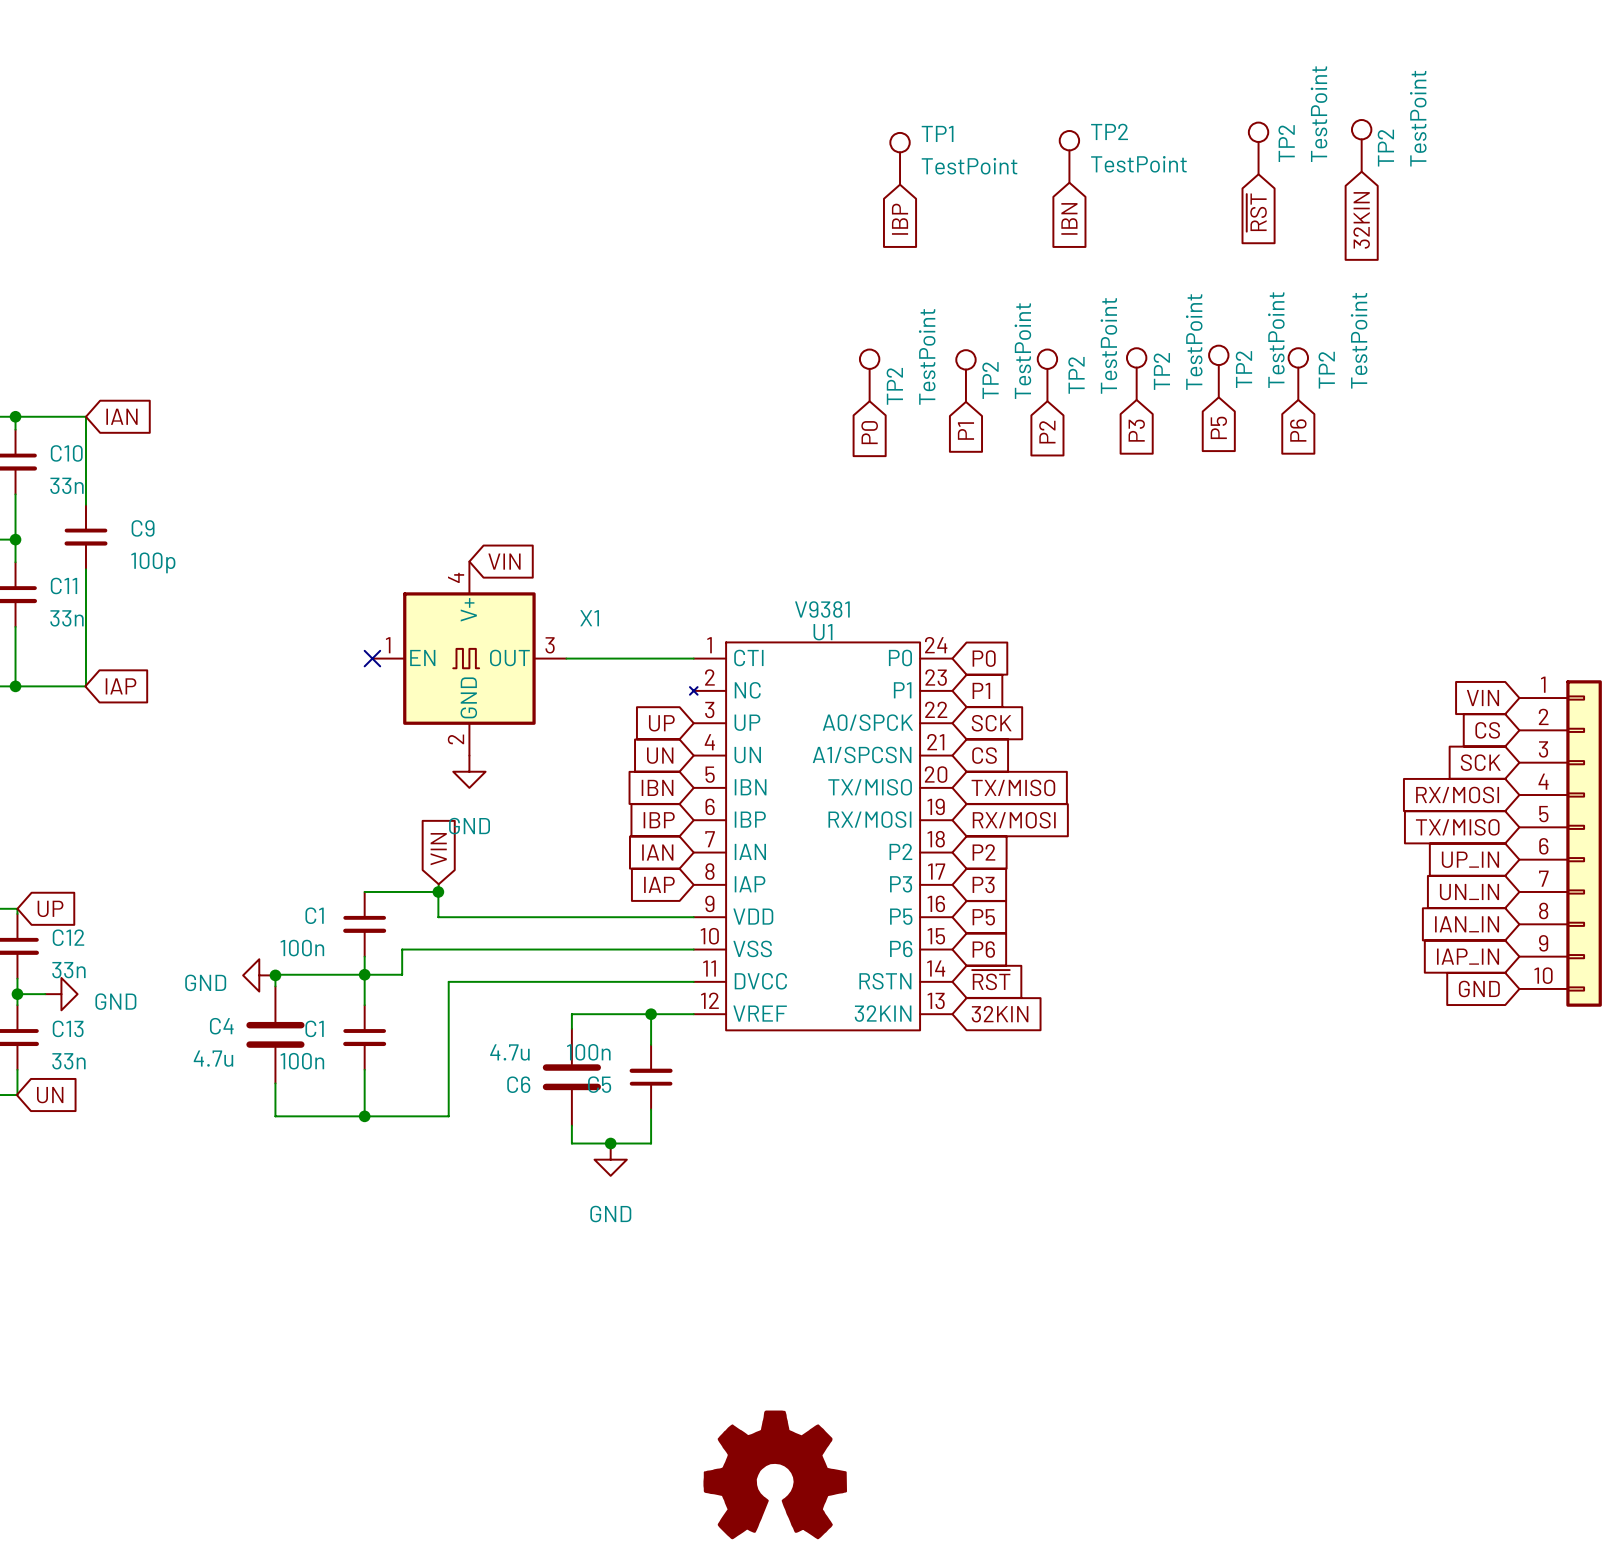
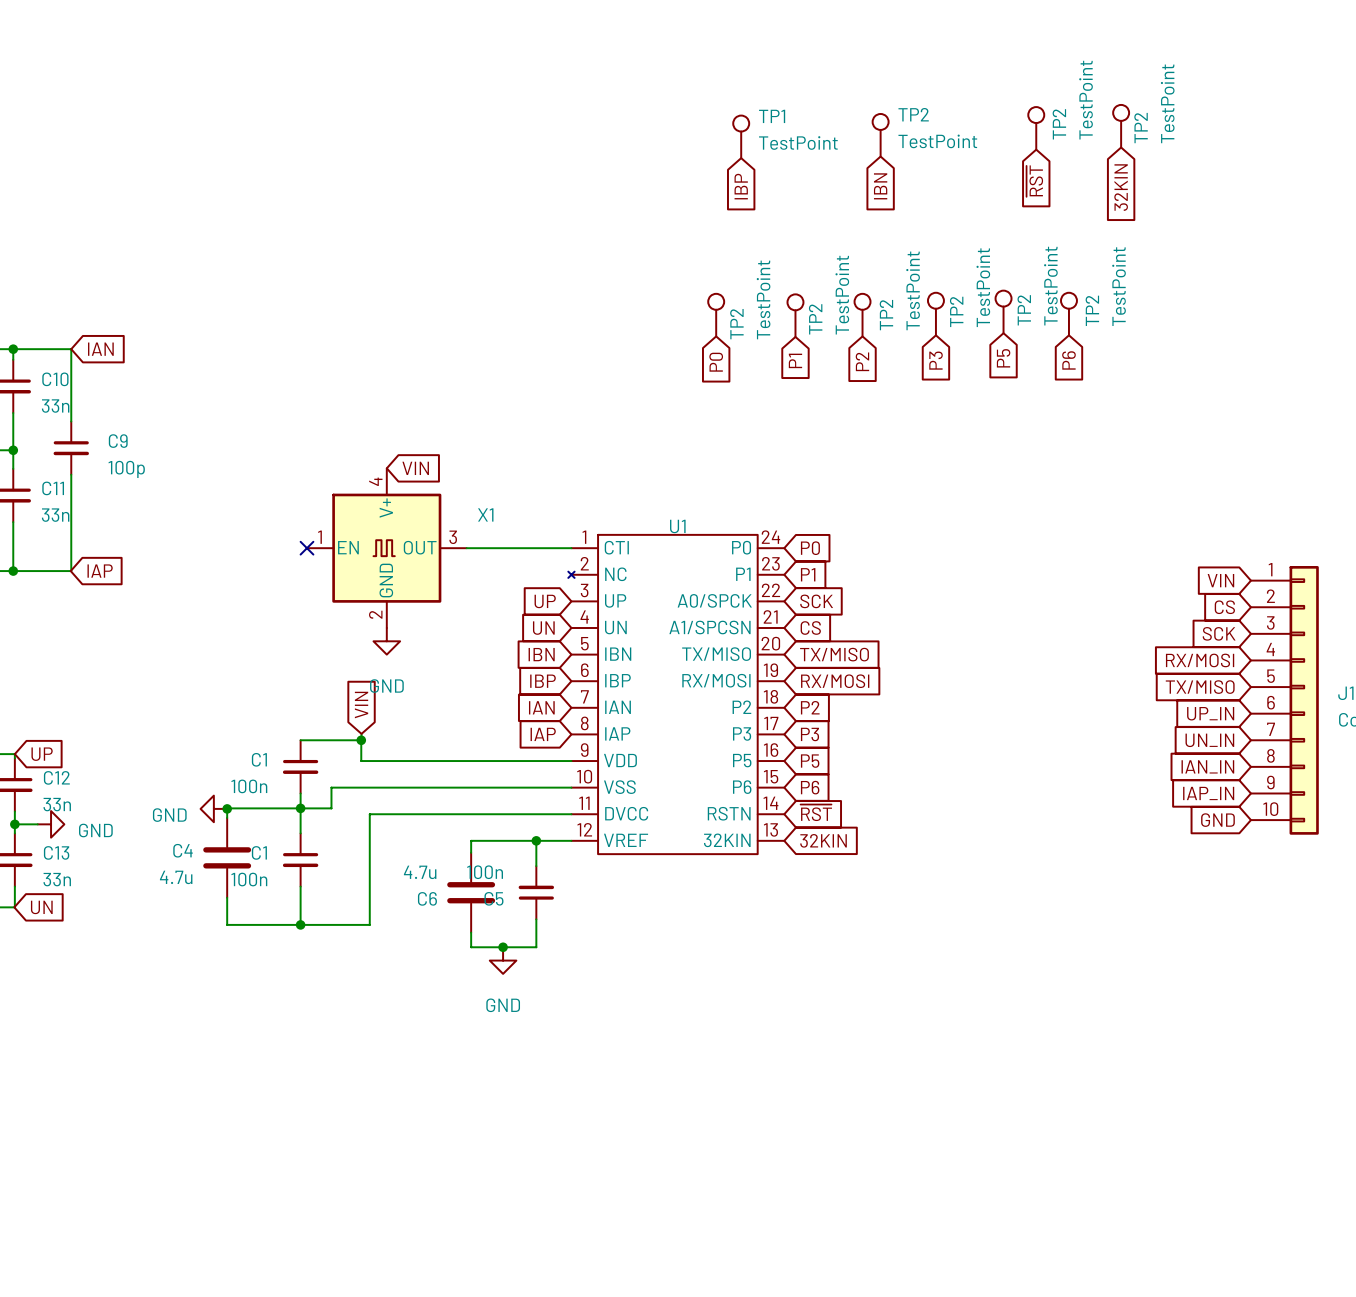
U1 value: V9381 (822, 609) -> none
part: (775, 1474) -> none

